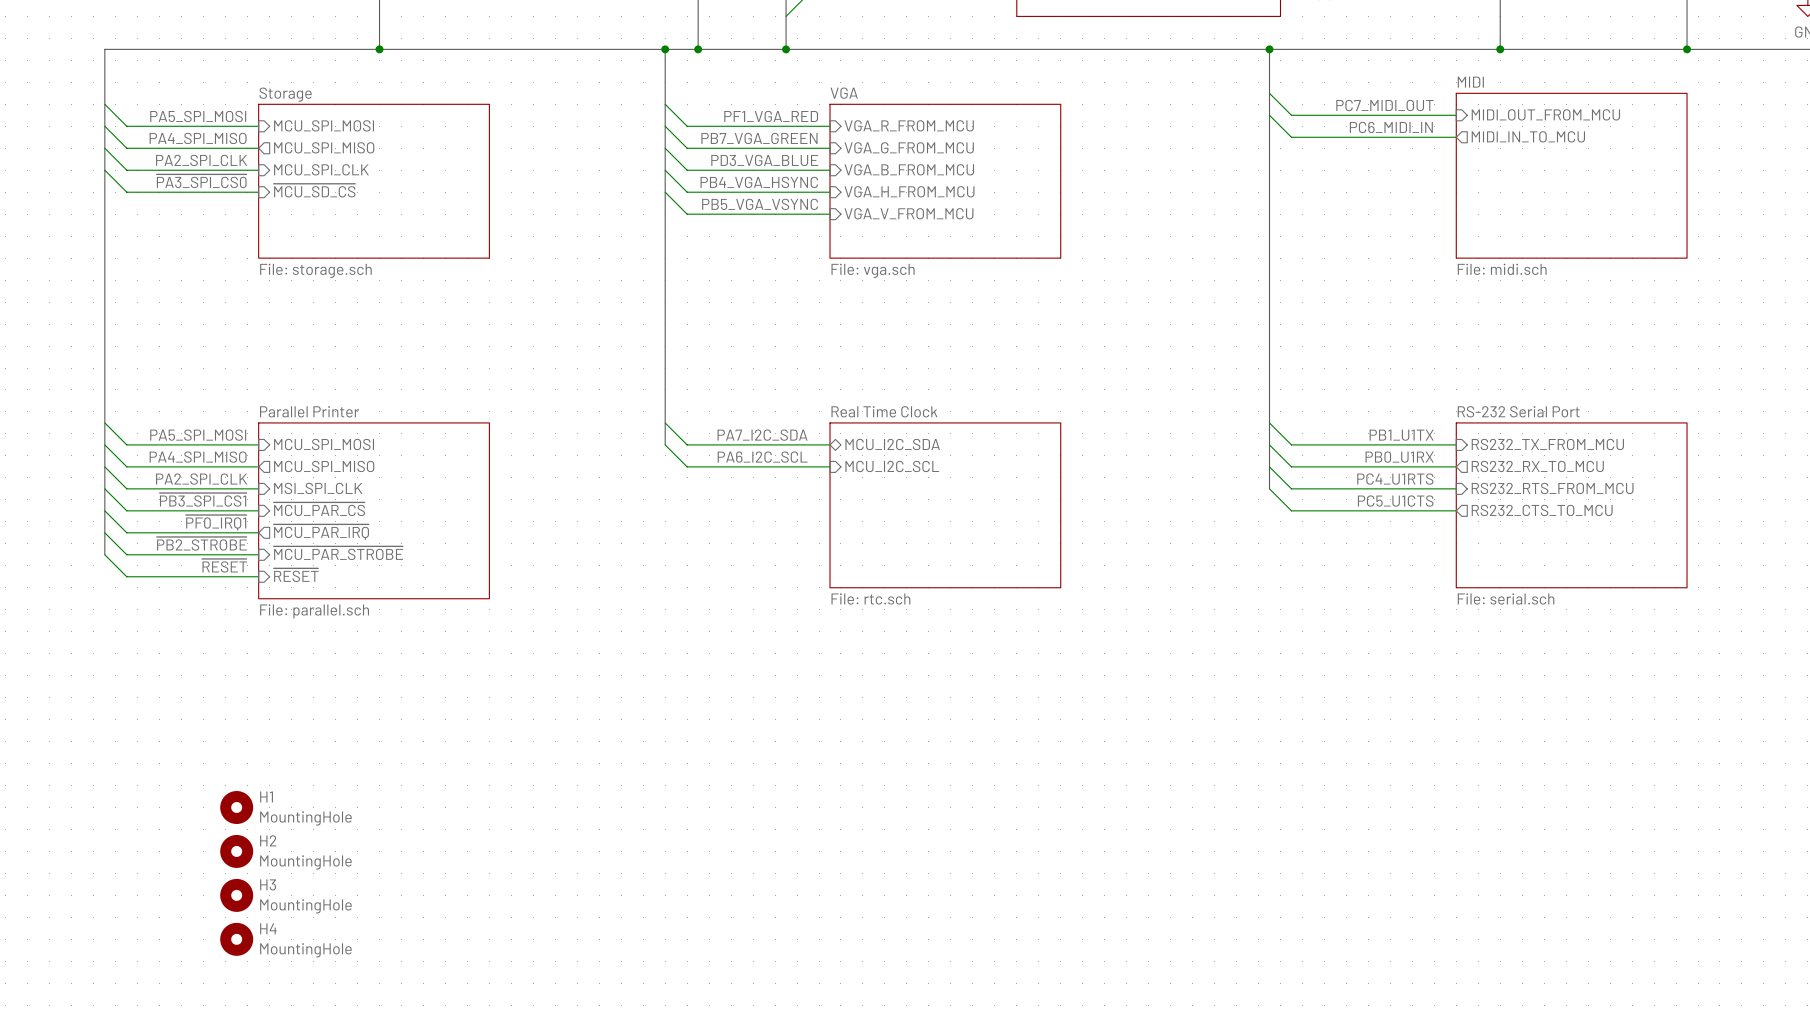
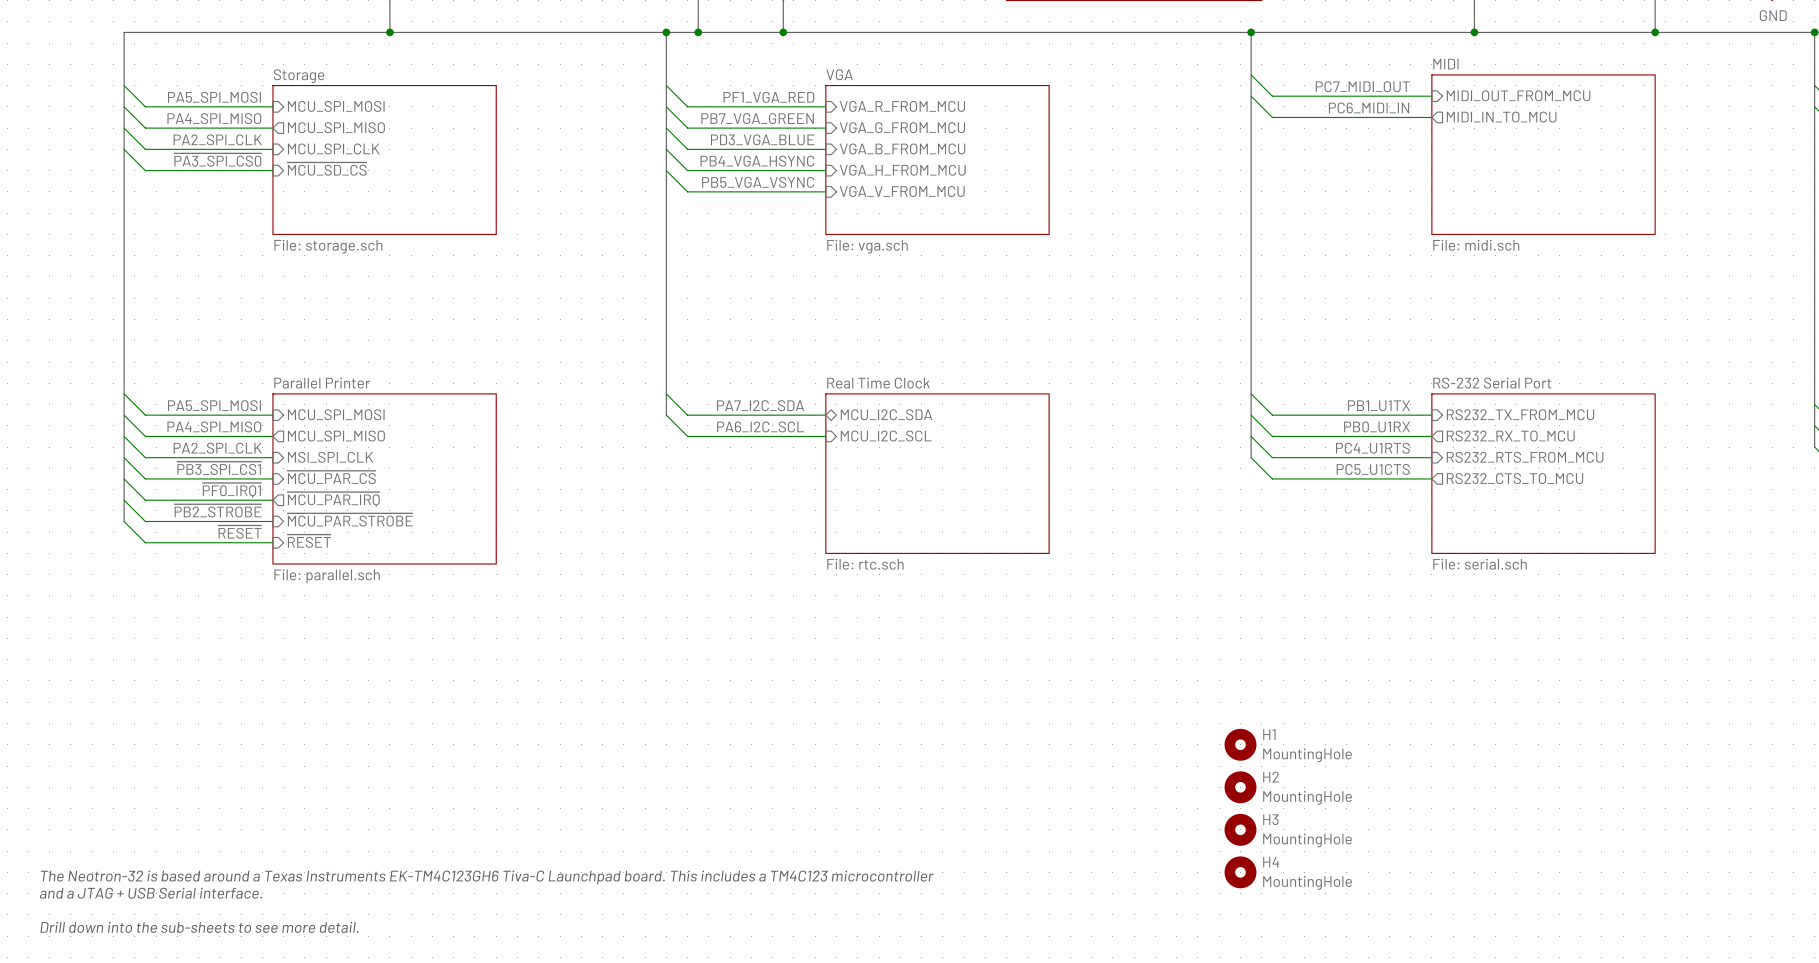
H1 position: (236, 807) -> (1240, 744)
H2 position: (236, 851) -> (1240, 787)
H3 position: (236, 895) -> (1240, 829)
text: none -> The Neotron-32 is based around a Texas Instruments EK-TM4C123GH6 Tiva-C Launchpad board. This includes a TM4C123 microcontroller (487, 877)
text: none -> and a JTAG + USB Serial interface. (151, 893)
H4 position: (236, 939) -> (1240, 872)
text: none -> Drill down into the sub-sheets to see more detail. (199, 927)

